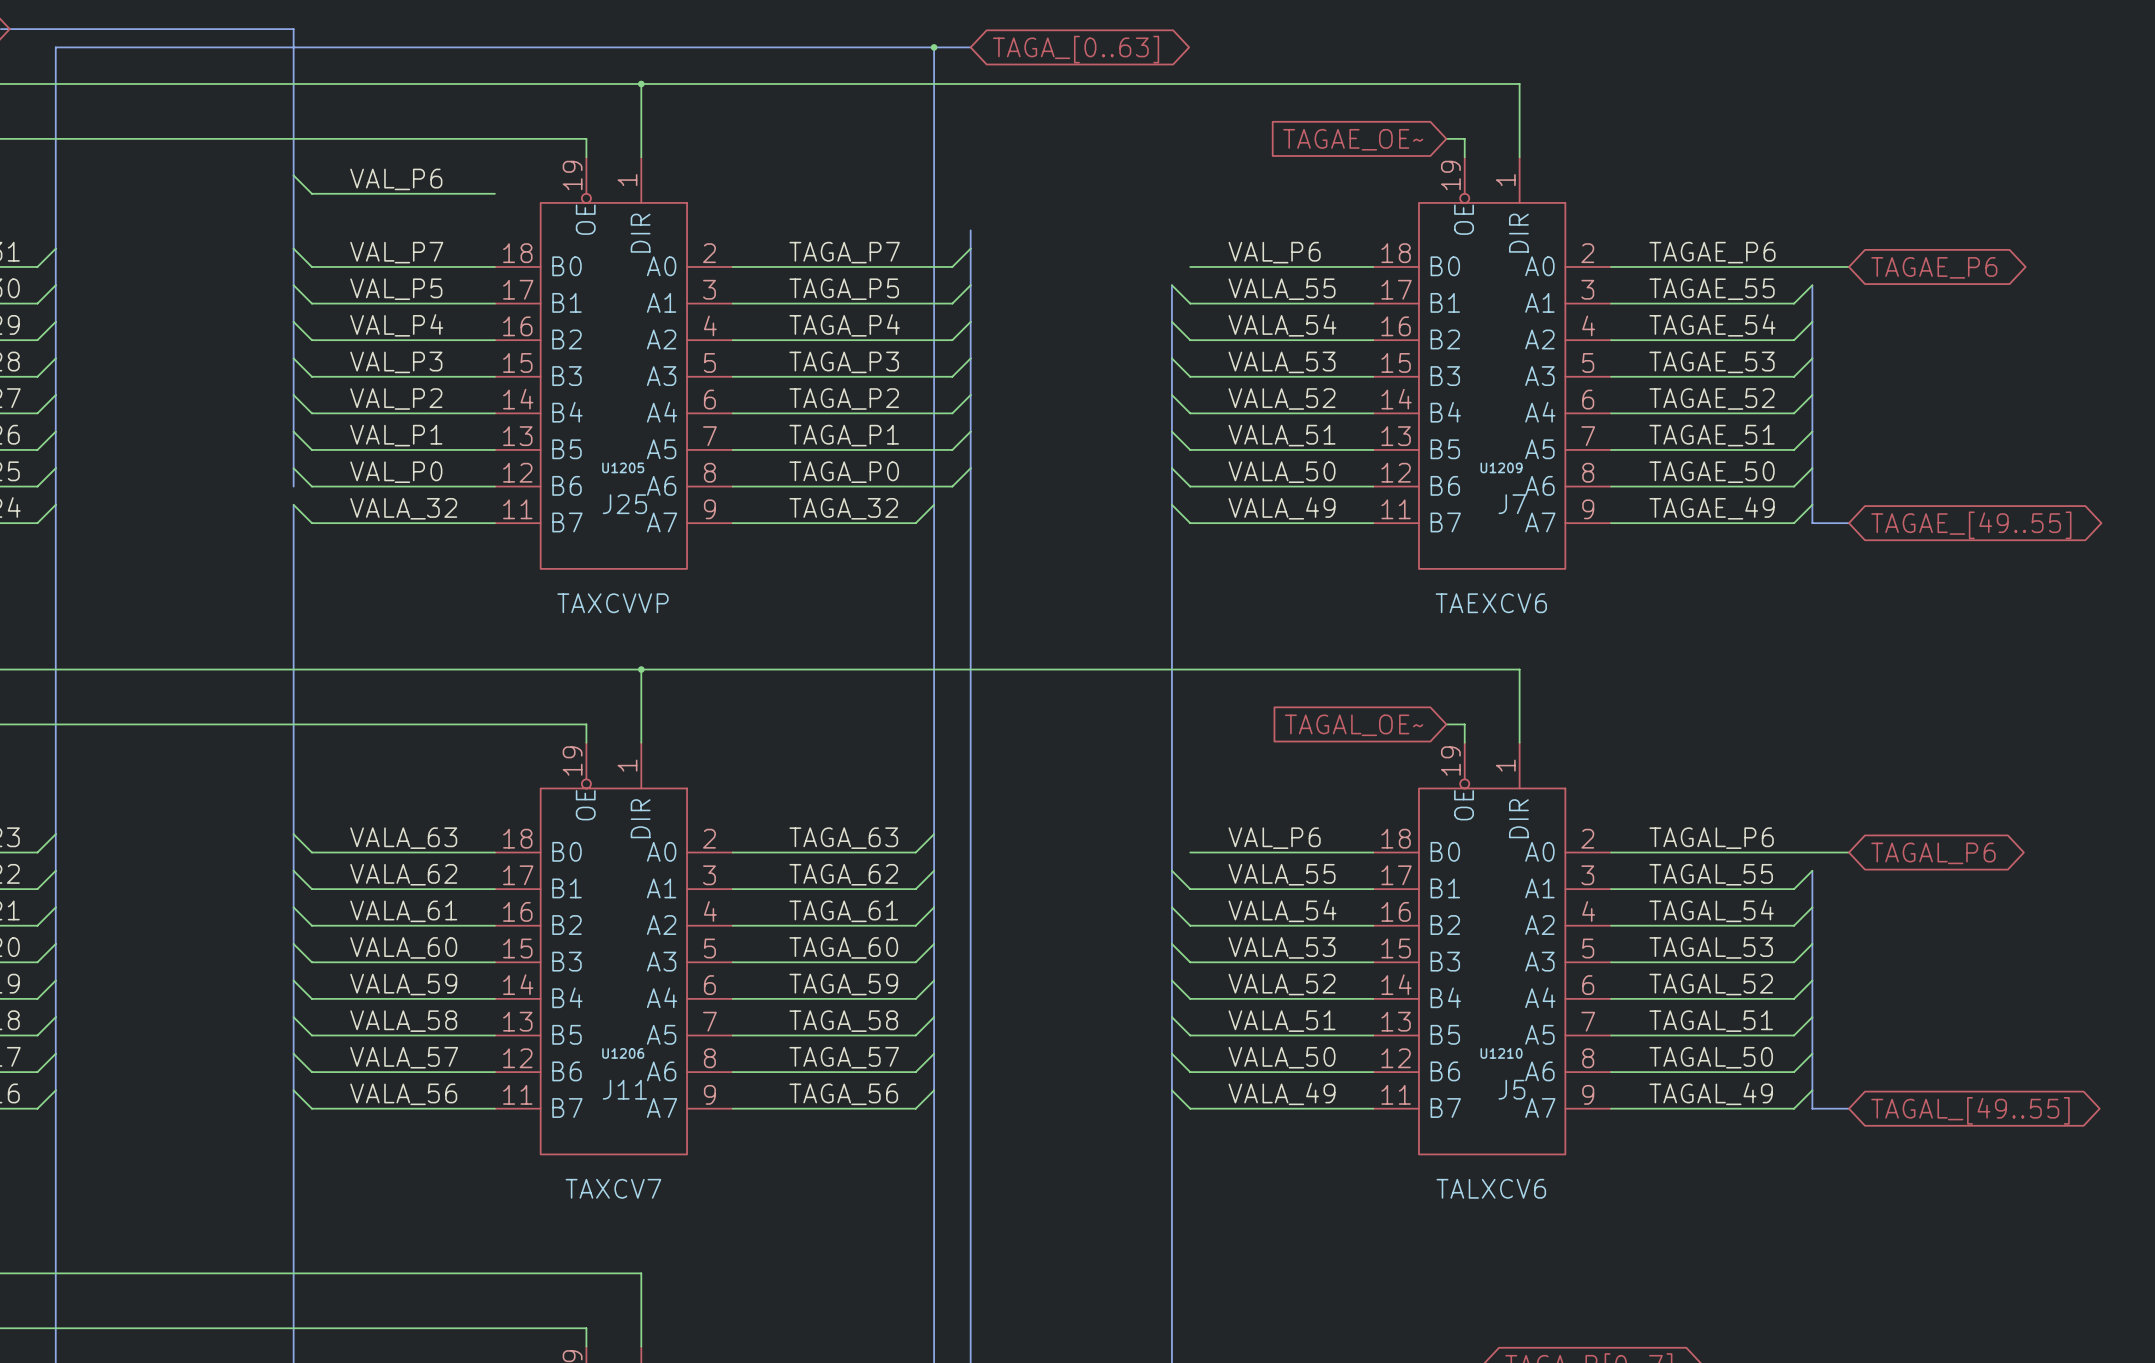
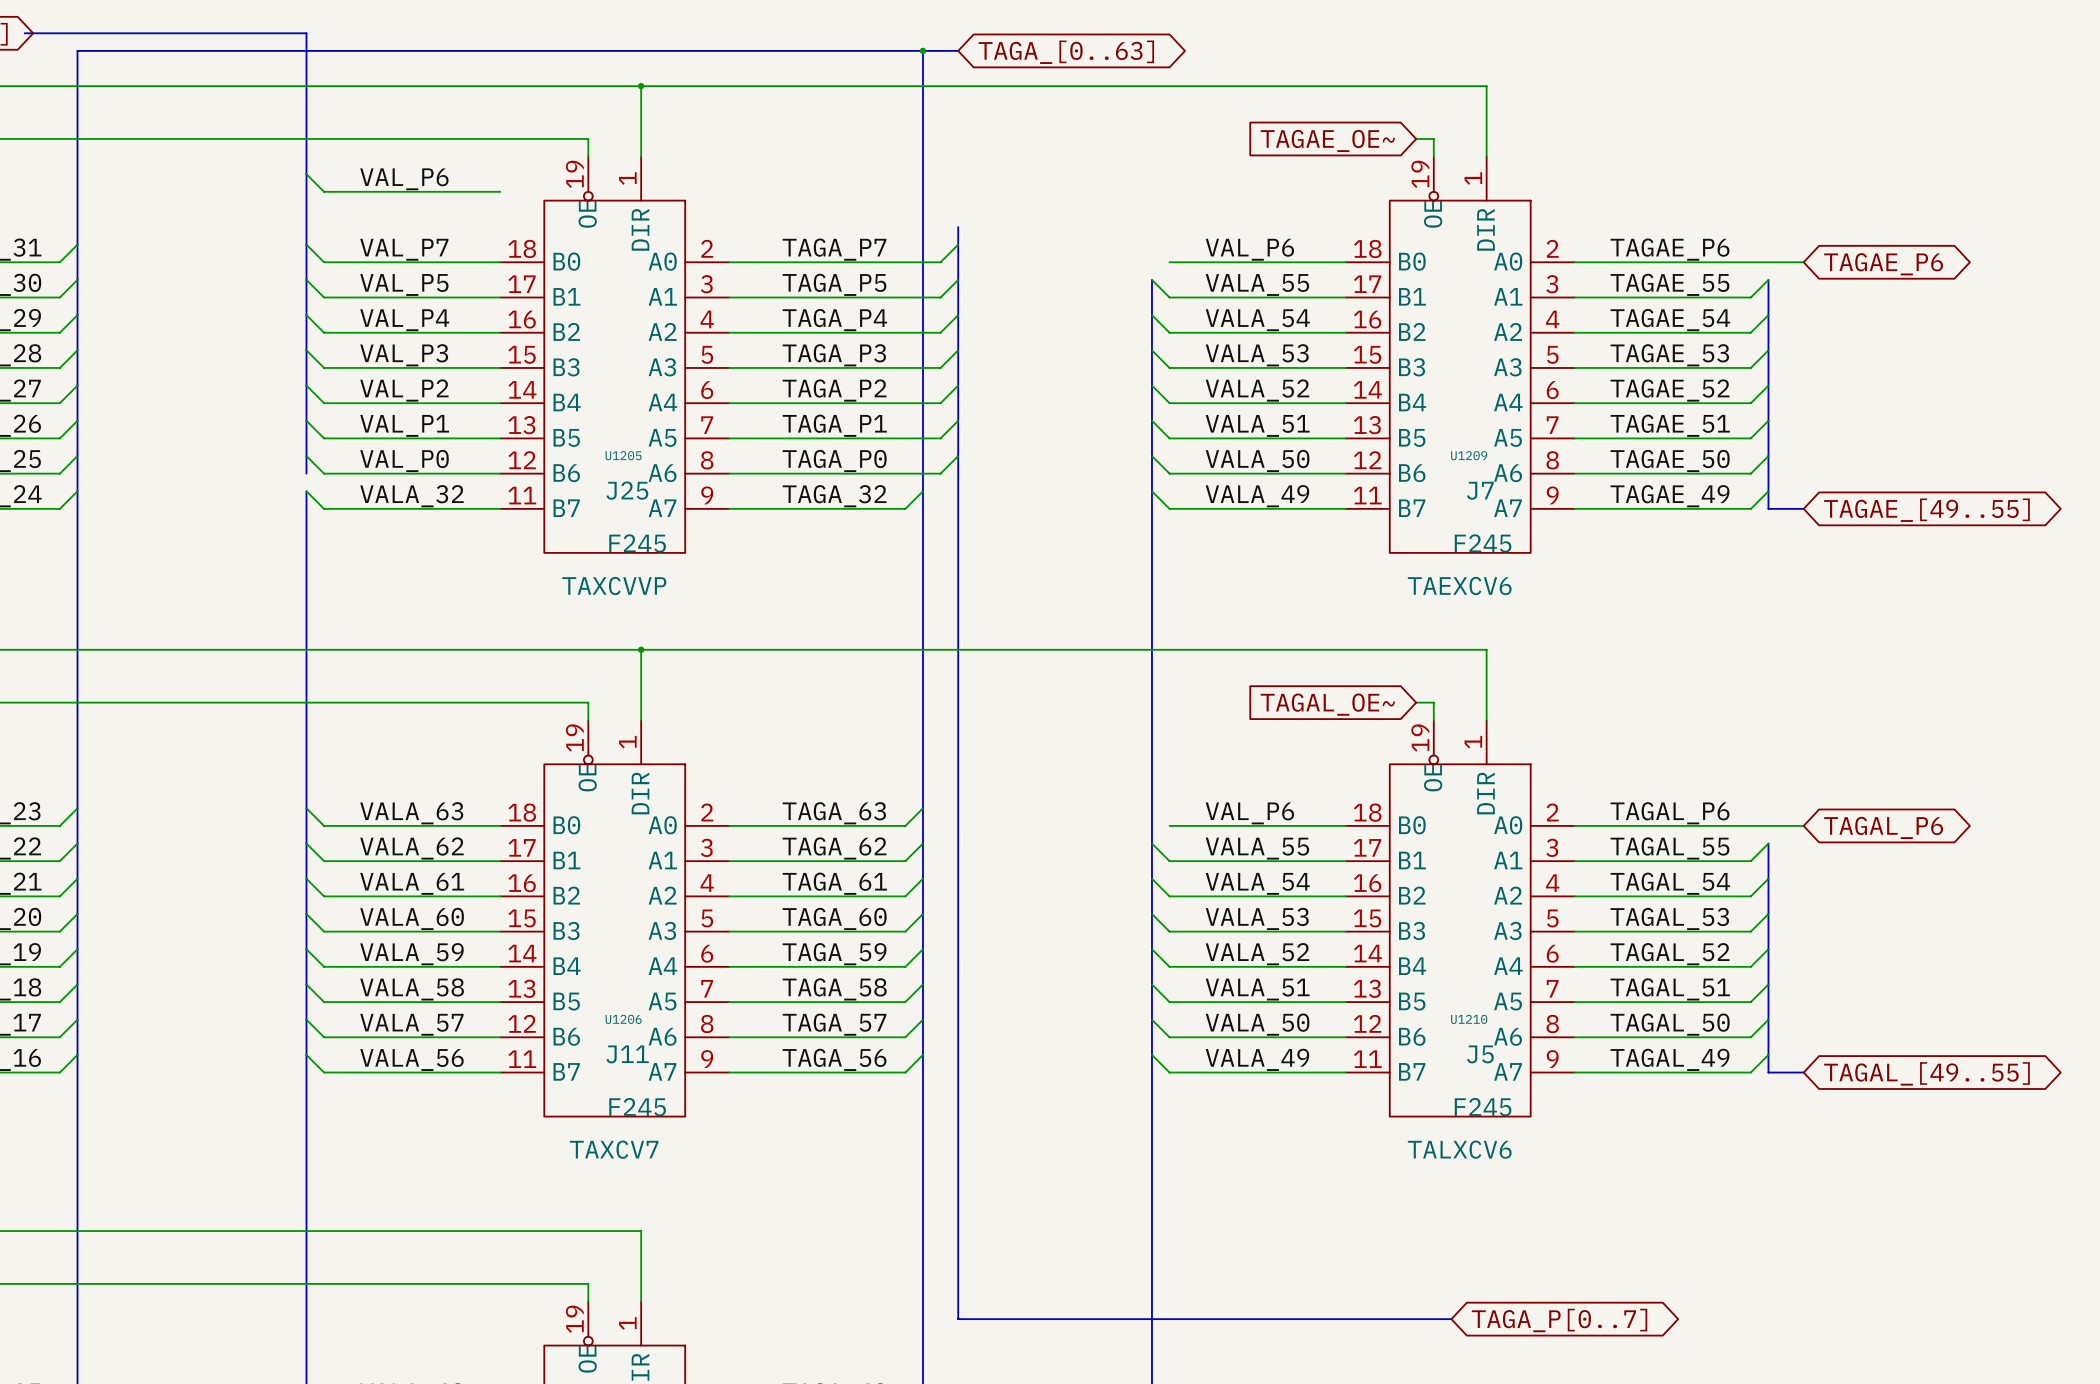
U1205 value: none -> F245 (637, 543)
U1209 value: none -> F245 (1483, 543)
U1206 value: none -> F245 (637, 1107)
U1210 value: none -> F245 (1483, 1107)

